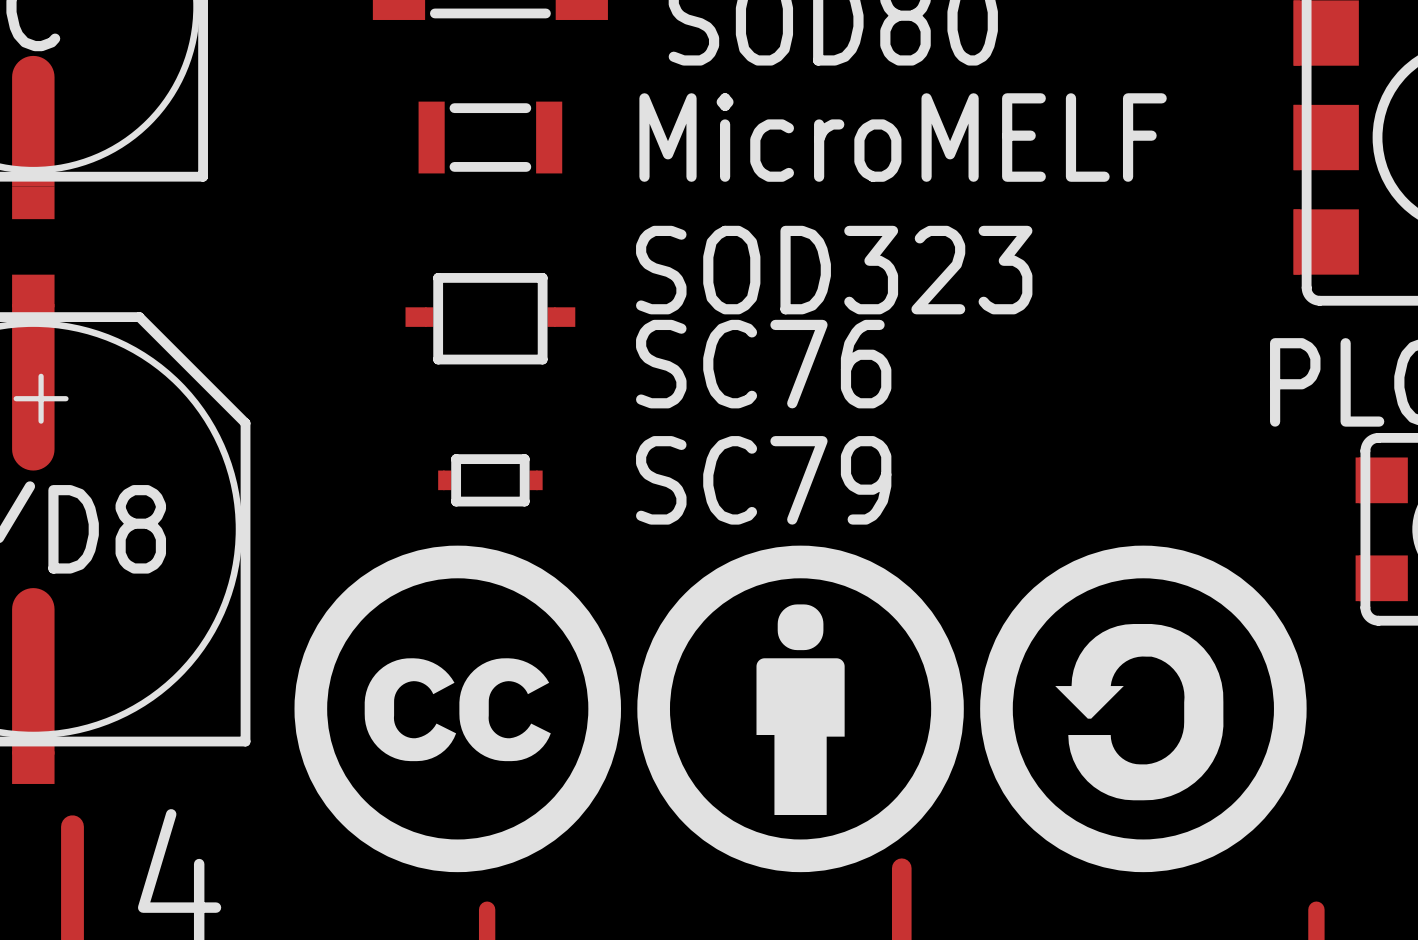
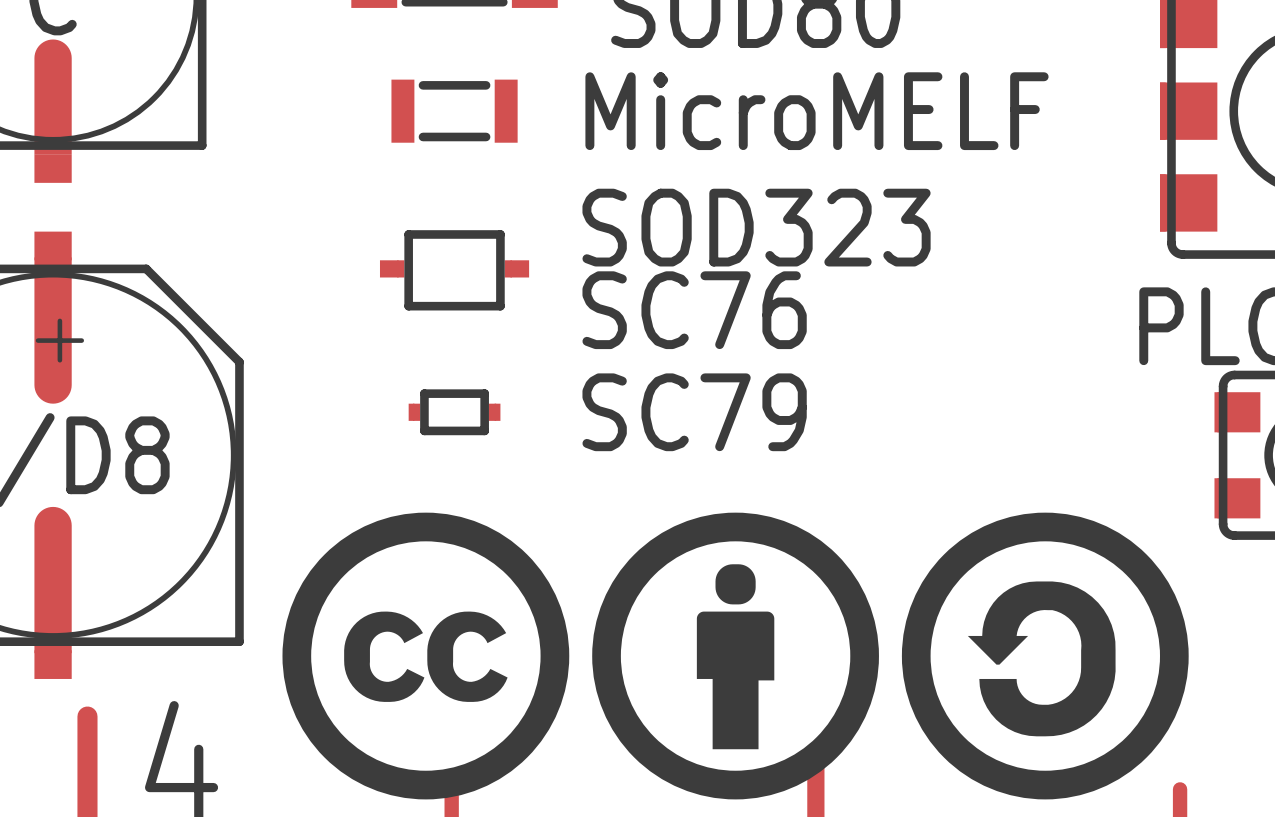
drawing position: (457, 708) -> (425, 656)
drawing position: (800, 708) -> (735, 656)
drawing position: (1143, 708) -> (1045, 656)

